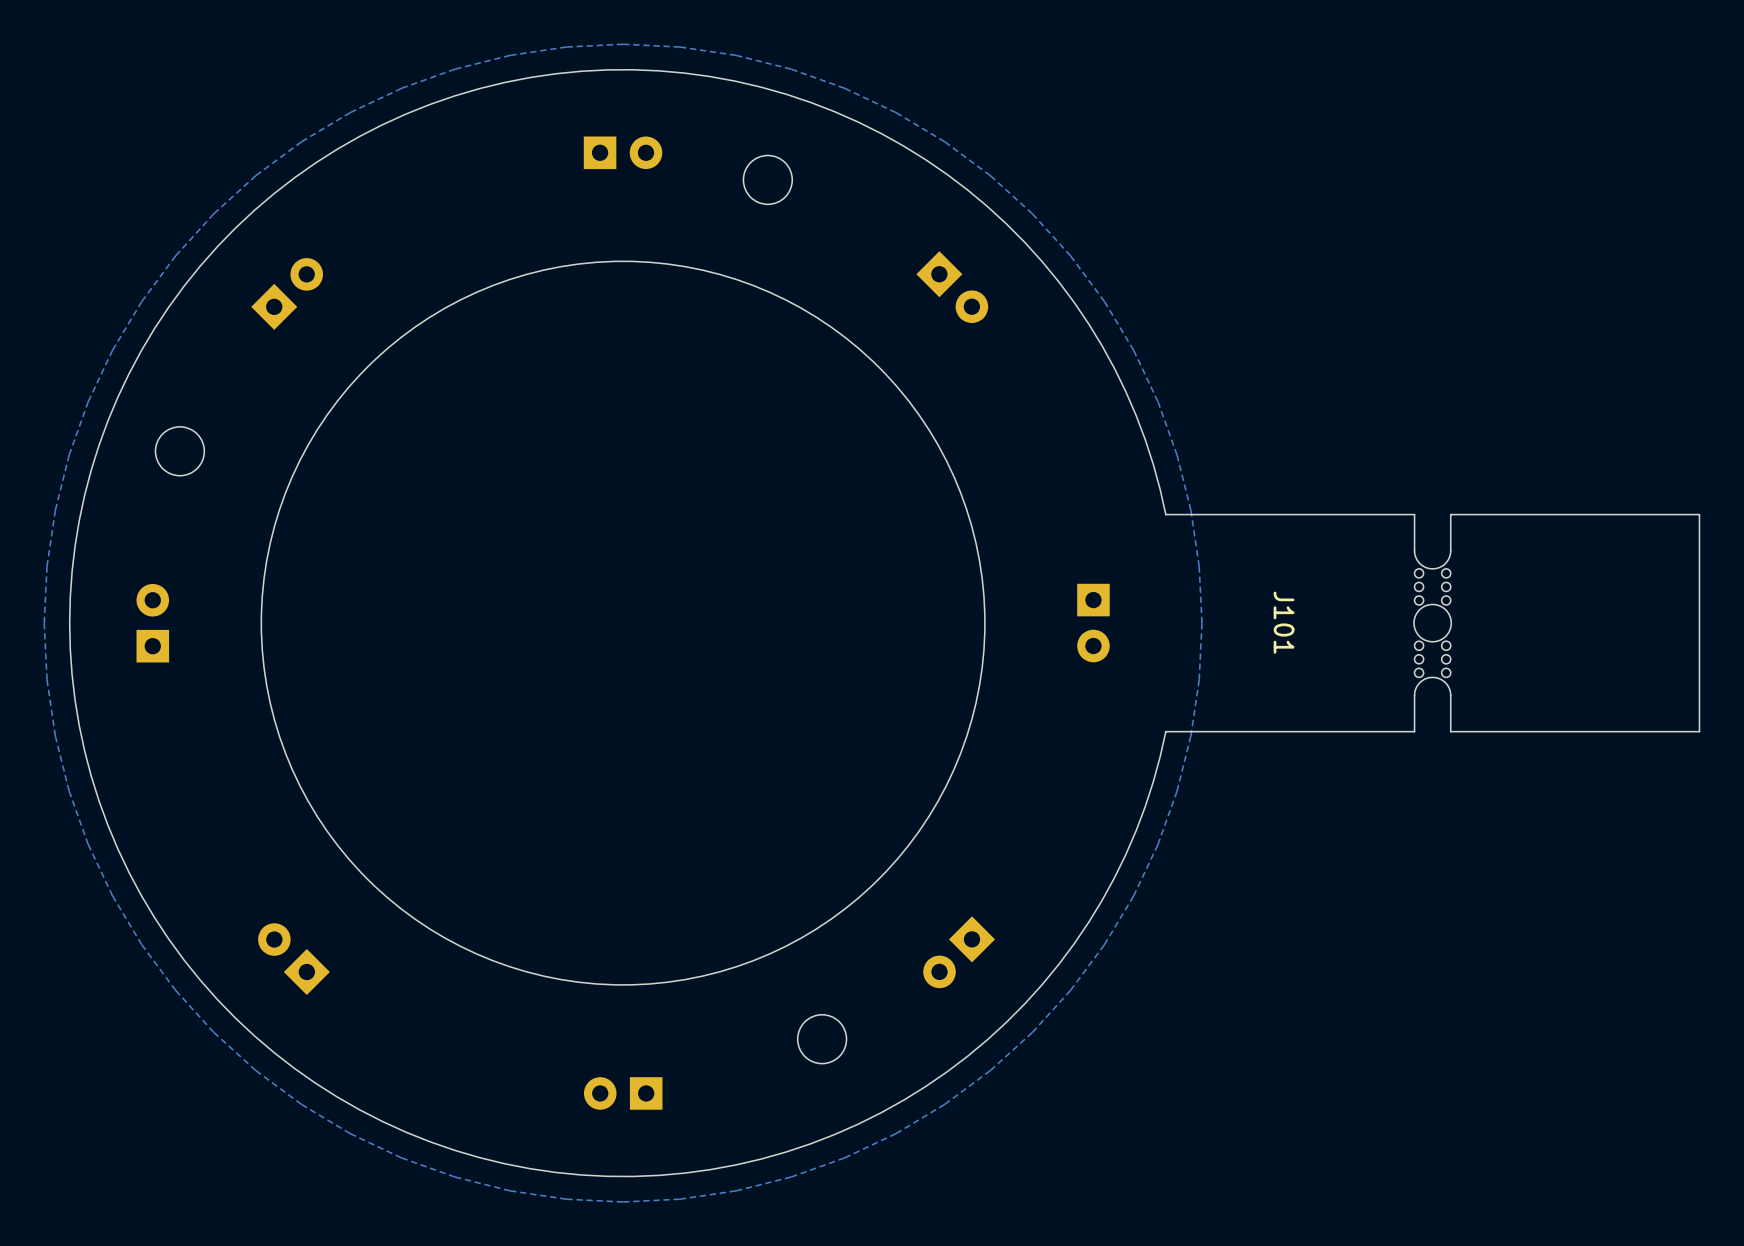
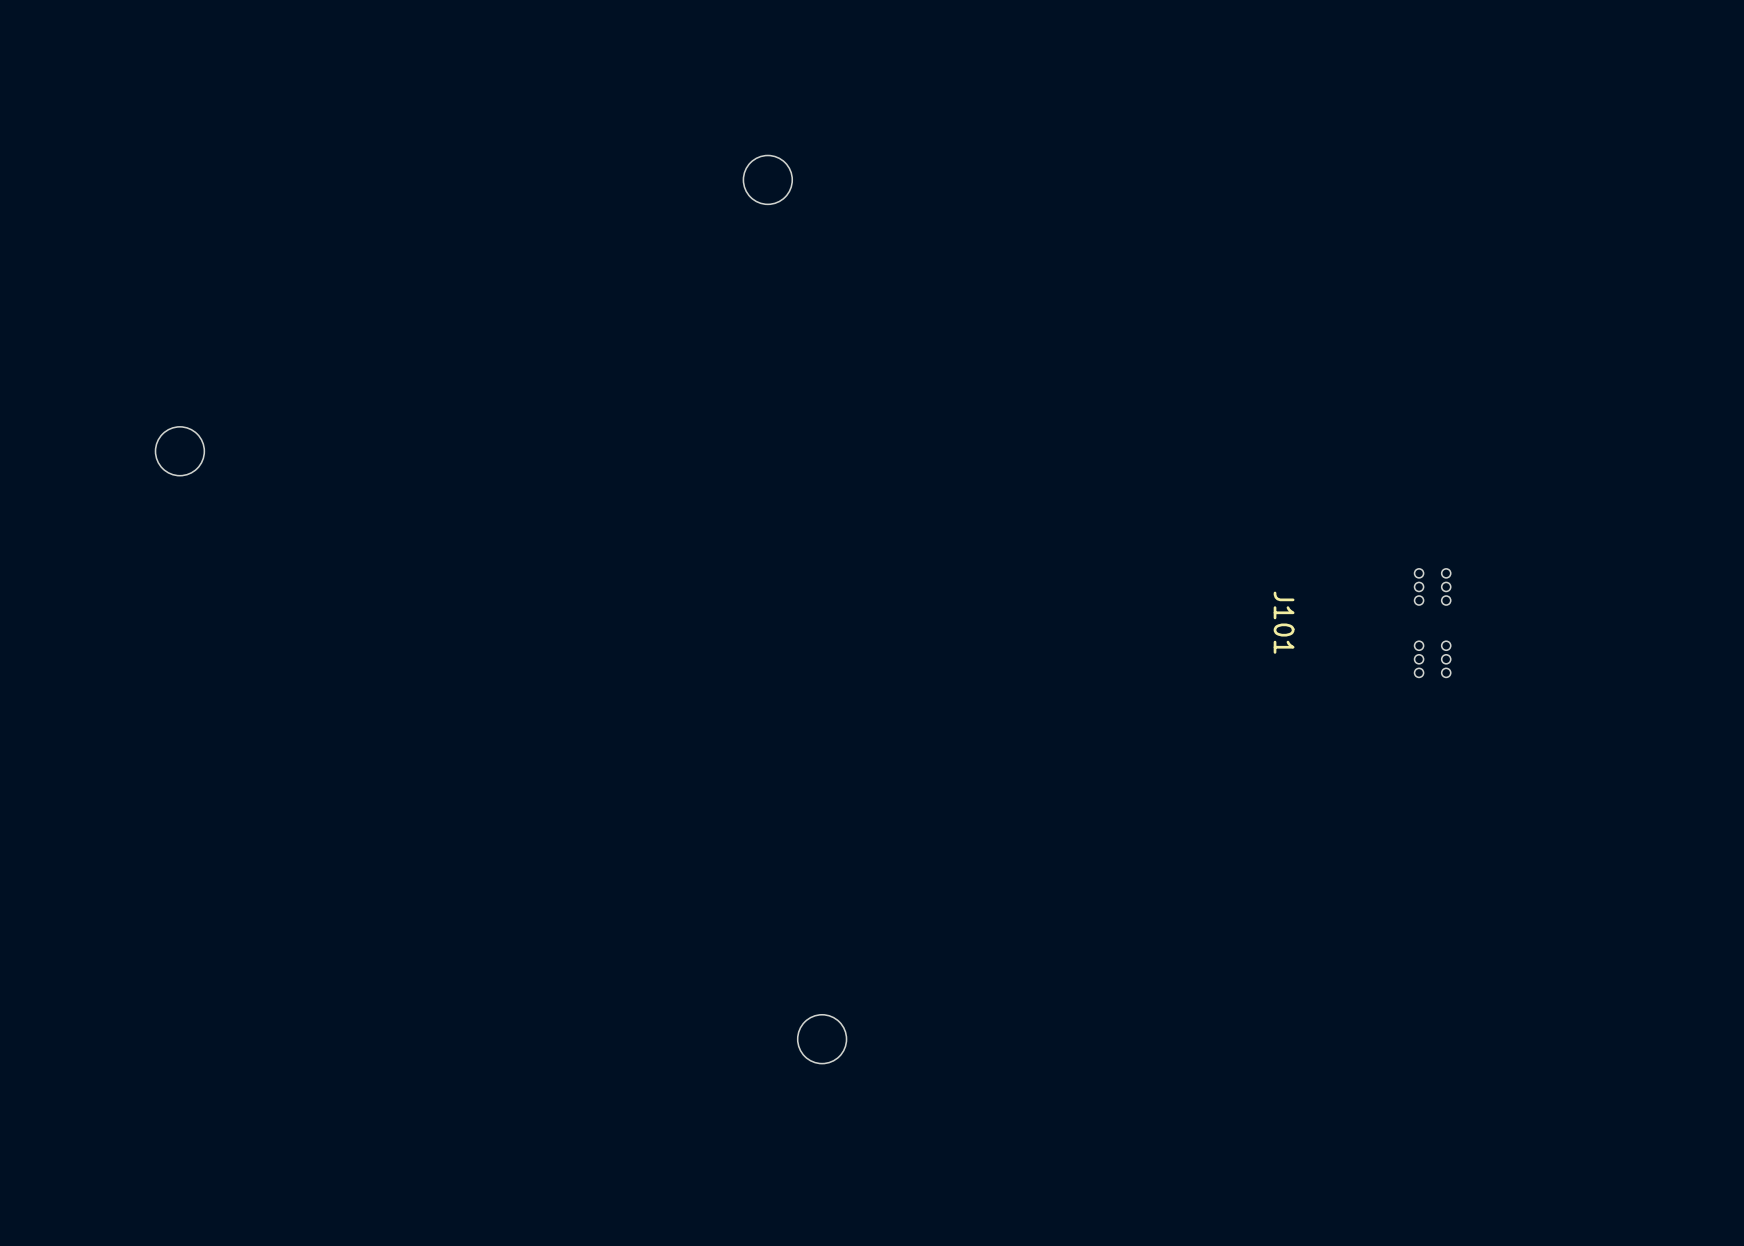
zone outline: (623, 44) (679, 47) (736, 55) (791, 69) (844, 88) (896, 112) (944, 141) (990, 175) (1032, 213) (1070, 255) (1104, 301) (1133, 350) (1157, 401) (1177, 455) (1190, 510) (1199, 566) (1201, 623) (1199, 679) (1190, 736) (1177, 791) (1157, 844) (1133, 896) (1104, 944) (1070, 990) (1032, 1032) (990, 1070) (944, 1104) (896, 1133) (844, 1157) (791, 1177) (736, 1190) (679, 1199) (623, 1201) (566, 1199) (510, 1190) (455, 1177) (401, 1157) (350, 1133) (301, 1104) (255, 1070) (213, 1032) (175, 990) (141, 944) (112, 896) (88, 844) (69, 791) (55, 736) (47, 679) (44, 623) (47, 566) (55, 510) (69, 455) (88, 401) (112, 350) (141, 301) (175, 255) (213, 213) (255, 175) (301, 141) (350, 112) (401, 88) (455, 69) (510, 55) (566, 47) (623, 44) -> none
part: (623, 152) -> none
round board edge: [260, 260, 986, 986] -> none
part: (952, 287) -> none
part: (287, 293) -> none
board edge: (1699, 514) (1699, 731) (1450, 731) (1450, 690) (1443, 681) (1432, 677) (1421, 681) (1415, 690) (1414, 731) (1165, 731) (1145, 806) (1114, 877) (1074, 943) (1042, 984) (1006, 1022) (967, 1056) (925, 1086) (858, 1124) (785, 1152) (735, 1164) (684, 1173) (607, 1176) (555, 1172) (504, 1163) (454, 1150) (406, 1132) (359, 1109) (315, 1083) (273, 1052) (235, 1017) (183, 959) (154, 917) (129, 872) (107, 825) (91, 776) (79, 725) (72, 674) (69, 623) (72, 571) (79, 520) (99, 445) (117, 397) (141, 350) (168, 307) (200, 266) (235, 228) (273, 193) (315, 163) (359, 136) (406, 113) (454, 95) (504, 82) (581, 71) (633, 69) (684, 73) (735, 81) (785, 94) (834, 111) (881, 133) (925, 159) (967, 190) (1006, 224) (1042, 261) (1088, 323) (1114, 368) (1136, 415) (1153, 464) (1165, 514) (1414, 514) (1415, 555) (1421, 565) (1432, 568) (1443, 565) (1450, 555) (1450, 514) (1699, 514) -> none
round board edge: [1413, 604, 1452, 643] -> none
part: (152, 623) -> none
part: (1093, 623) -> none
part: (959, 952) -> none
part: (293, 959) -> none
part: (623, 1093) -> none

